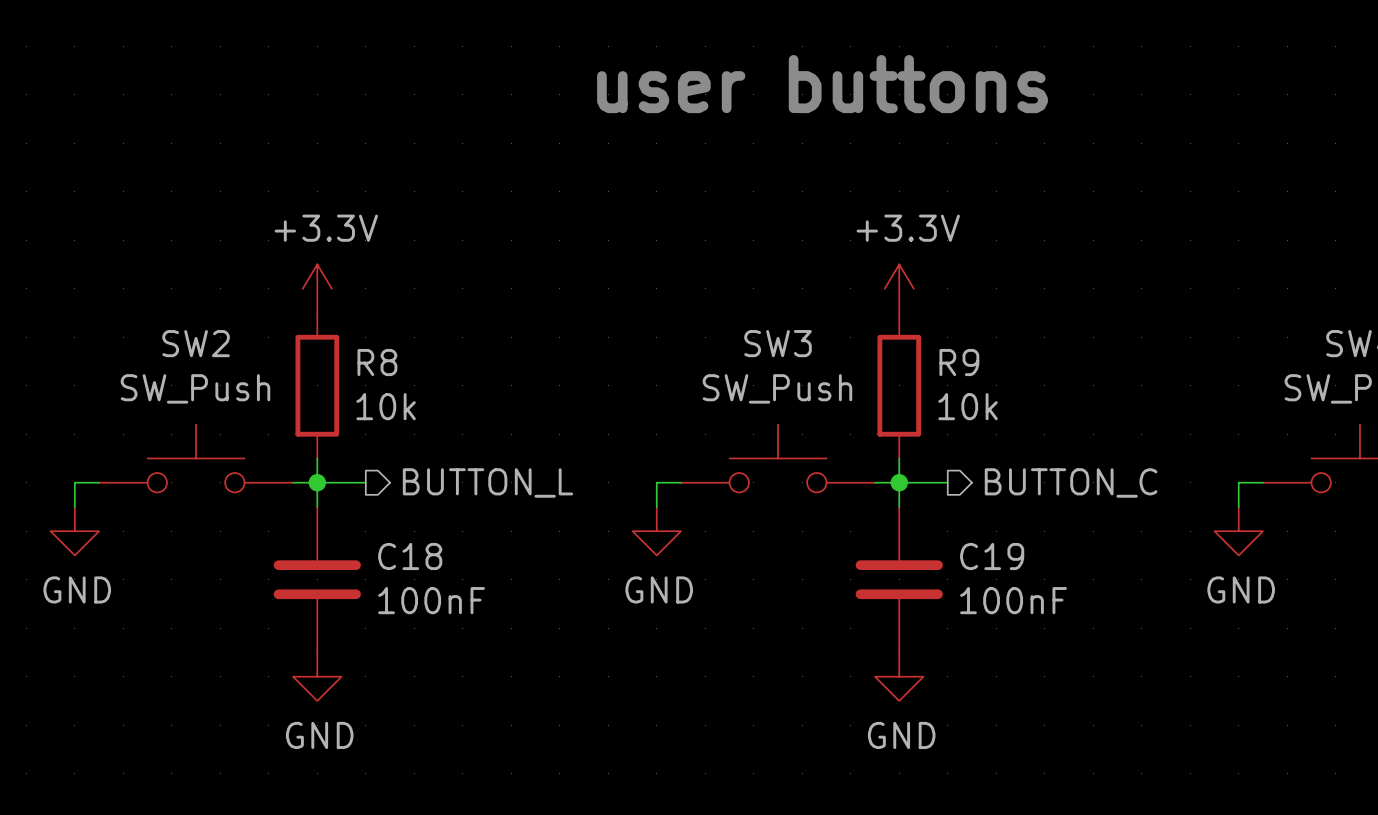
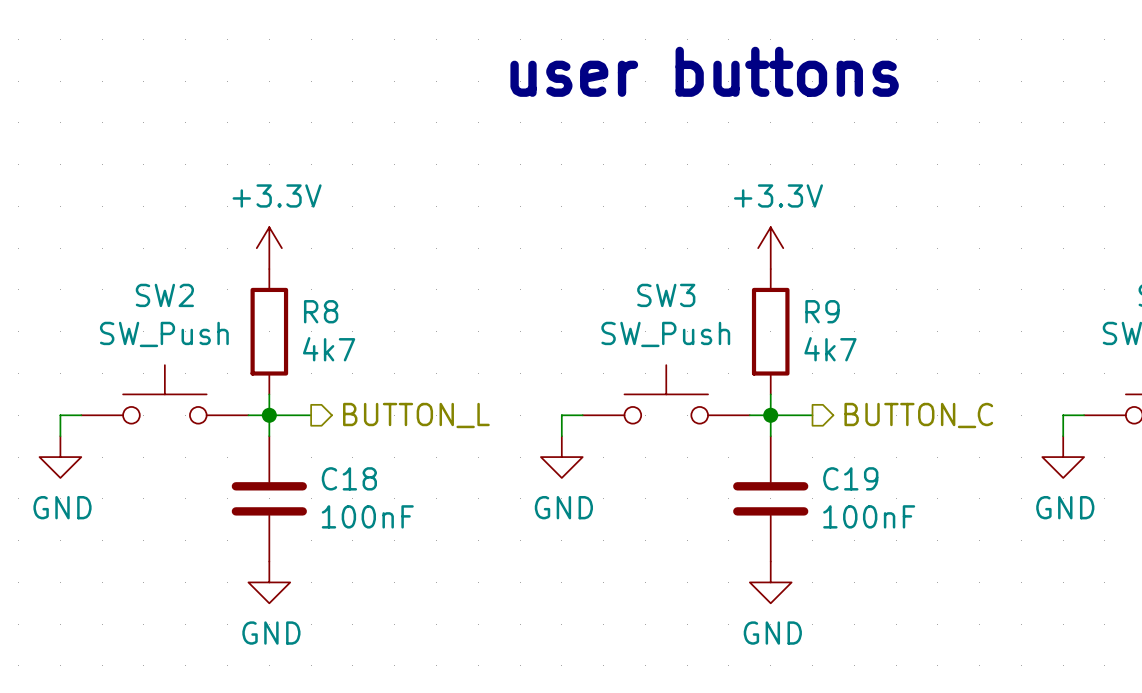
R8 value: 10k (386, 406) -> 4k7 (329, 349)
R9 value: 10k (968, 406) -> 4k7 (830, 349)

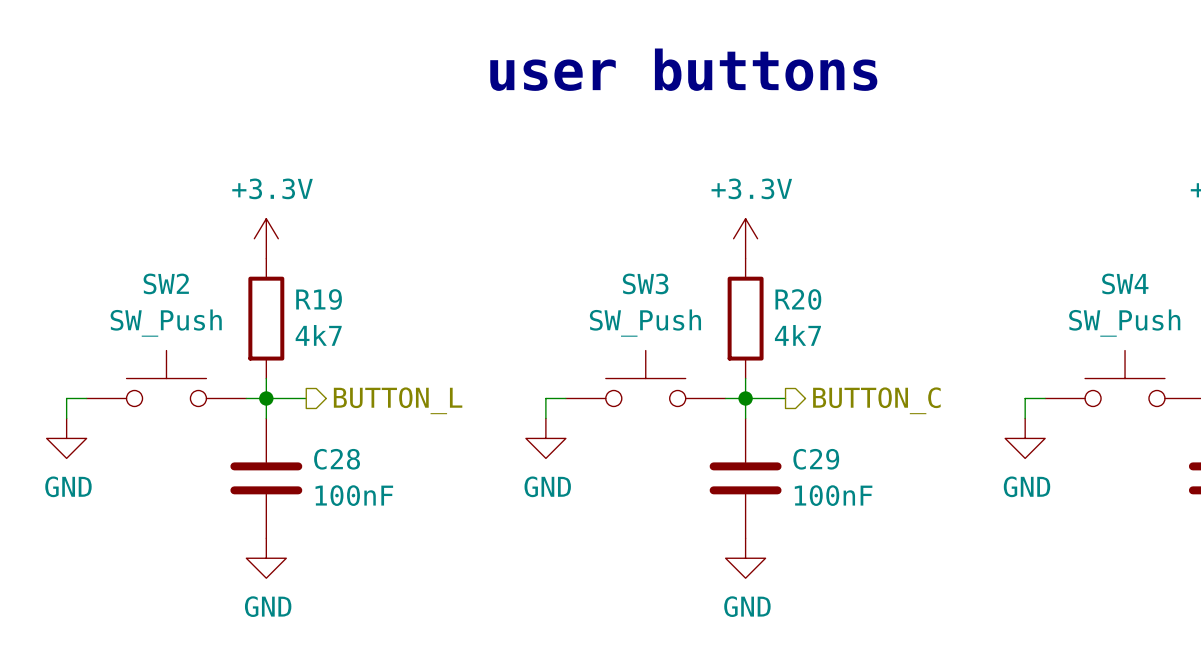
R8 name: R8 (321, 311) -> R19 (319, 299)
R9 name: R9 (822, 311) -> R20 (798, 299)
C18 name: C18 (349, 478) -> C28 (337, 459)
C19 name: C19 (850, 478) -> C29 (816, 459)

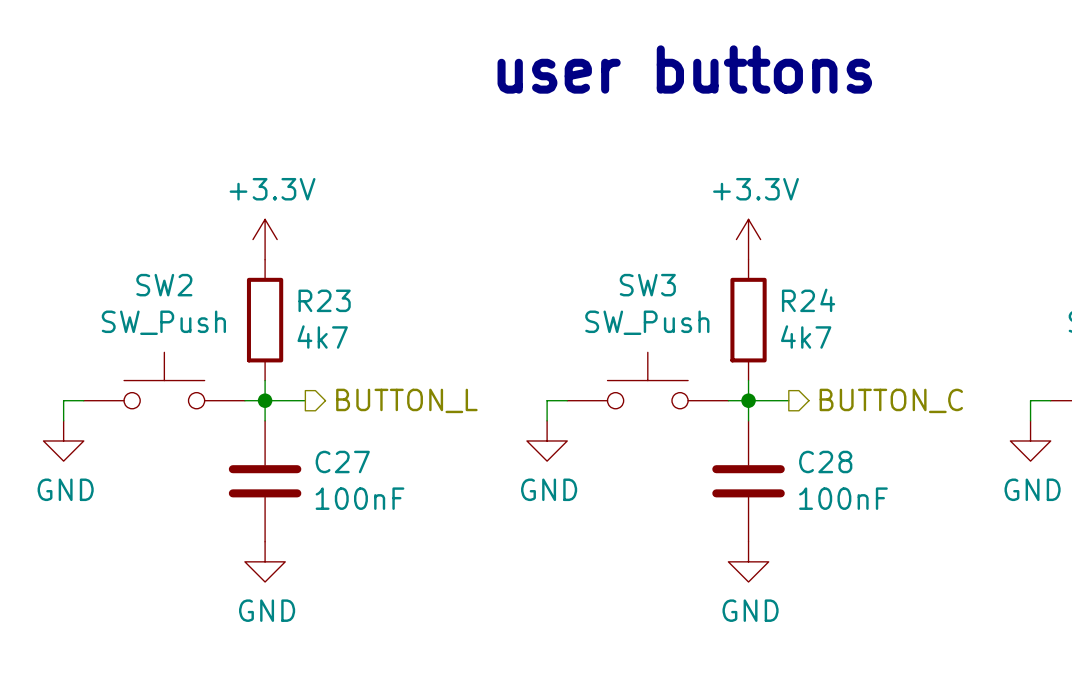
R19 name: R19 (319, 299) -> R23 (324, 300)
R20 name: R20 (798, 299) -> R24 (808, 300)
C28 name: C28 (337, 459) -> C27 (342, 461)
C29 name: C29 (816, 459) -> C28 (825, 461)

